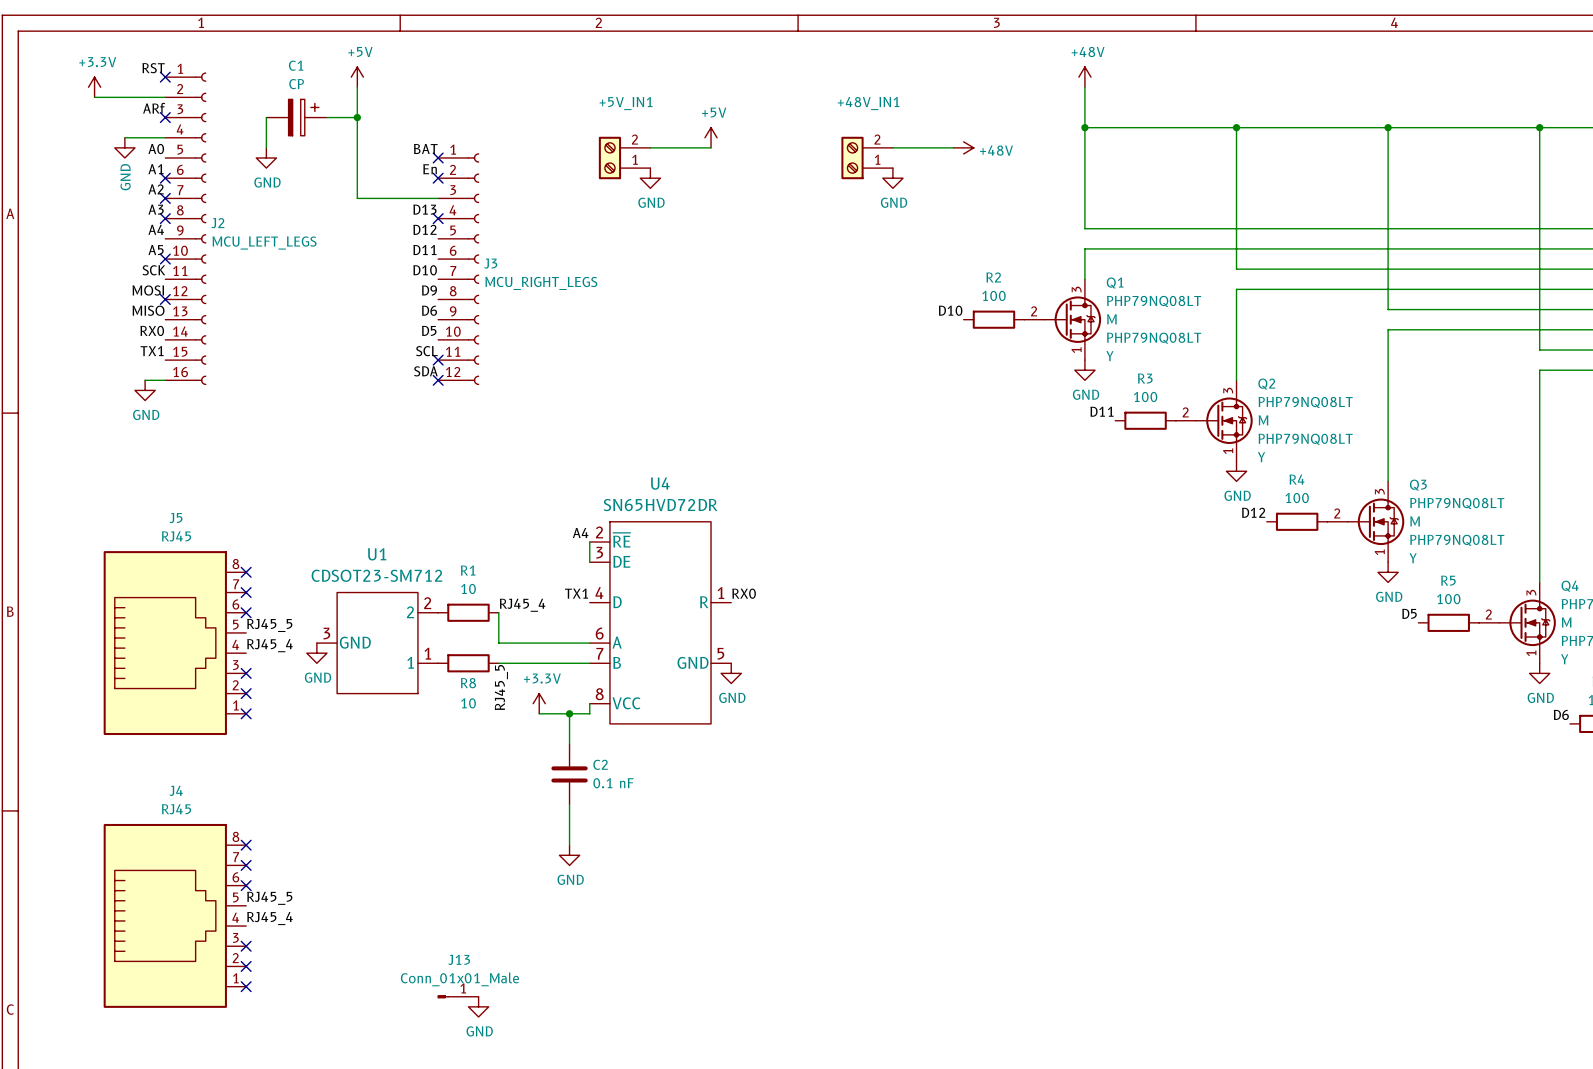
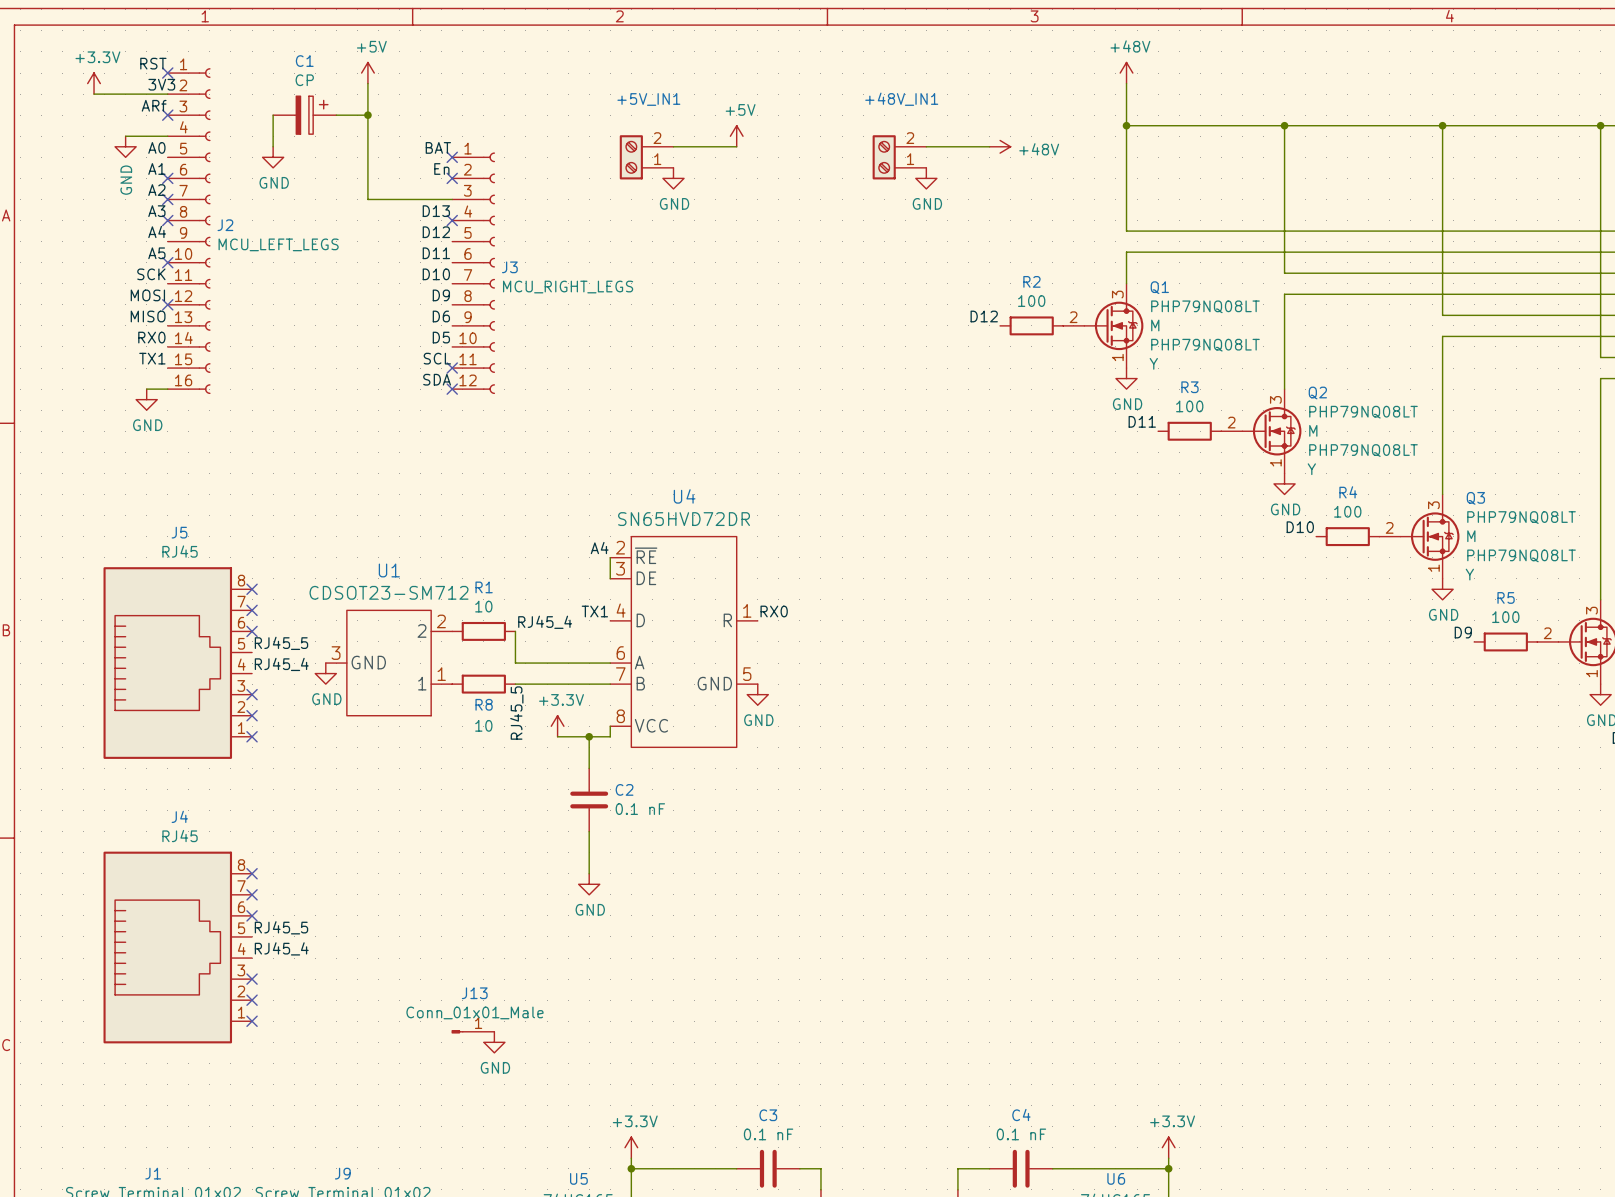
label: none -> 3V3 (161, 84)
label: D10 (950, 310) -> D12 (984, 316)
label: D12 (1253, 512) -> D10 (1300, 527)
label: D5 (1409, 613) -> D9 (1463, 632)

